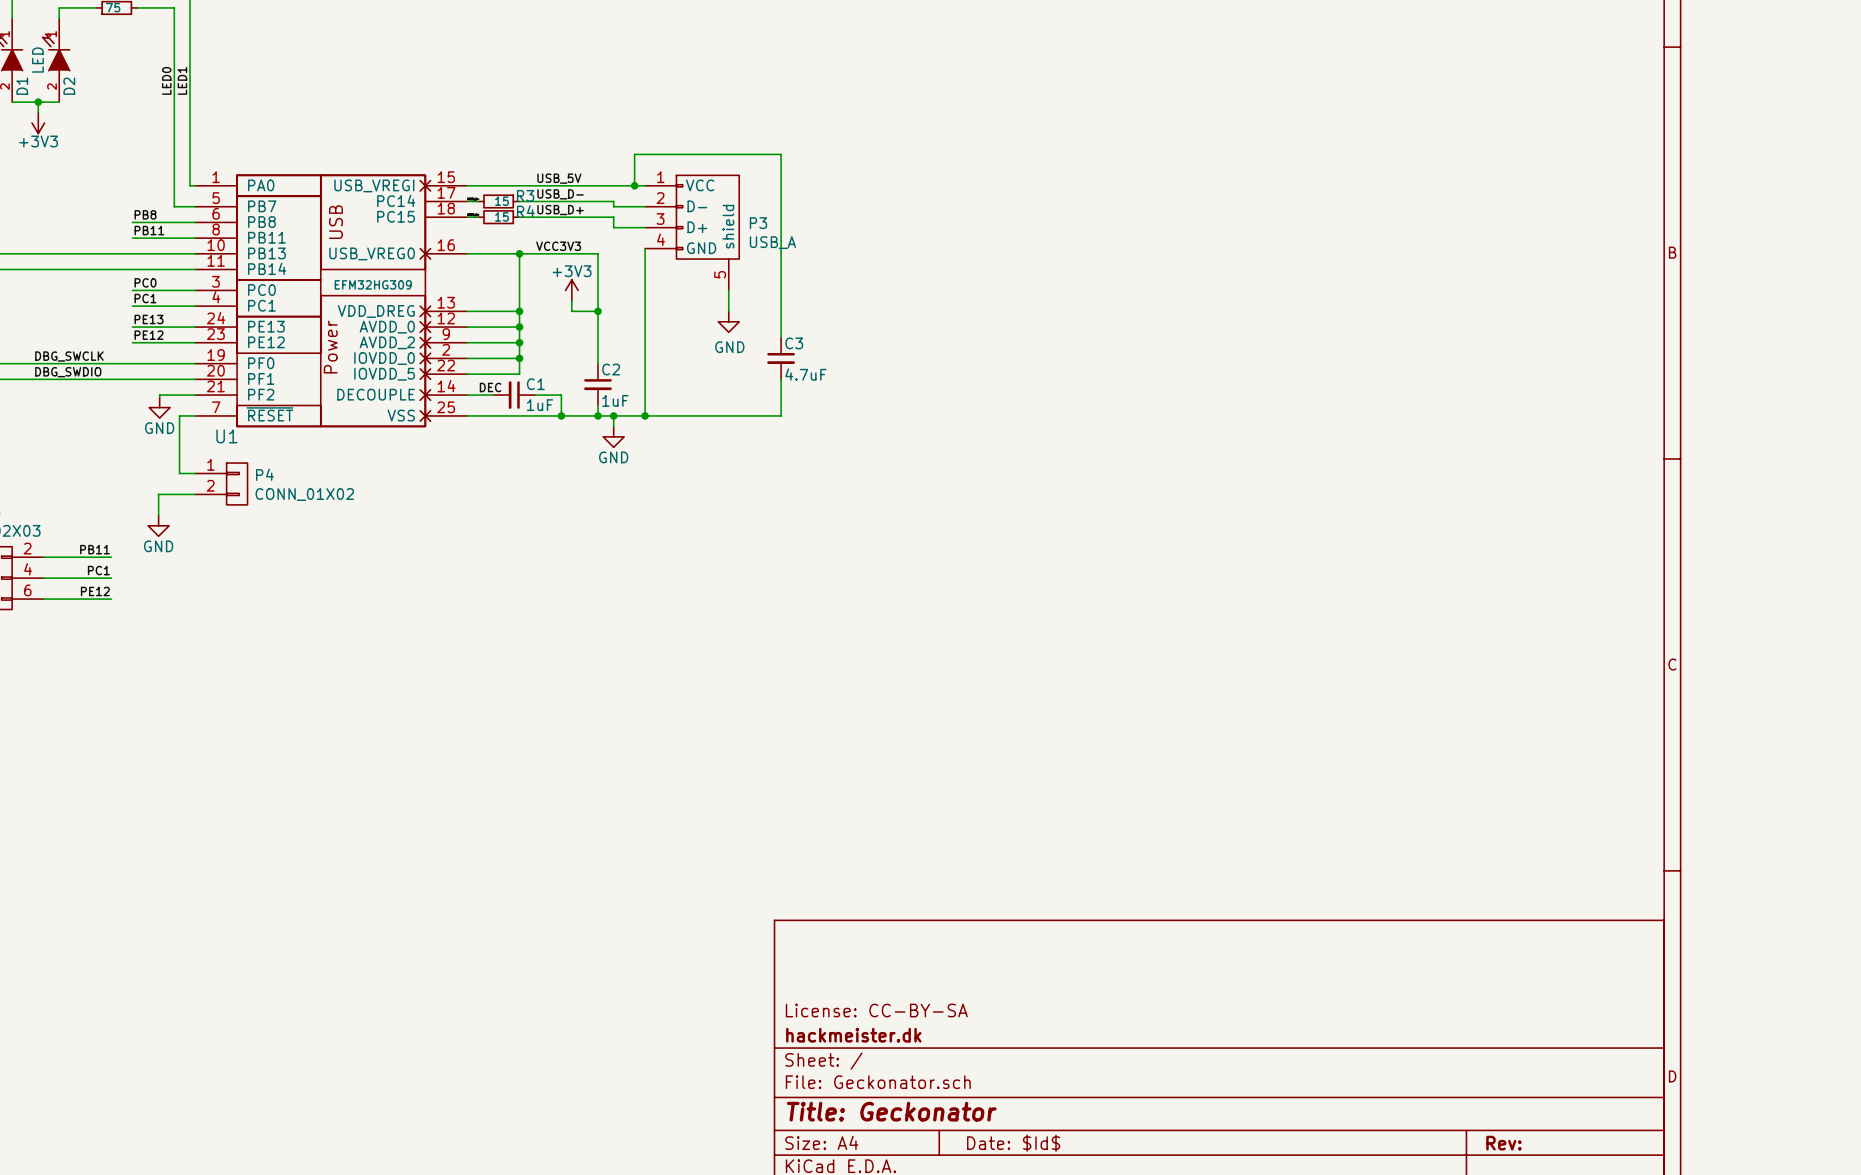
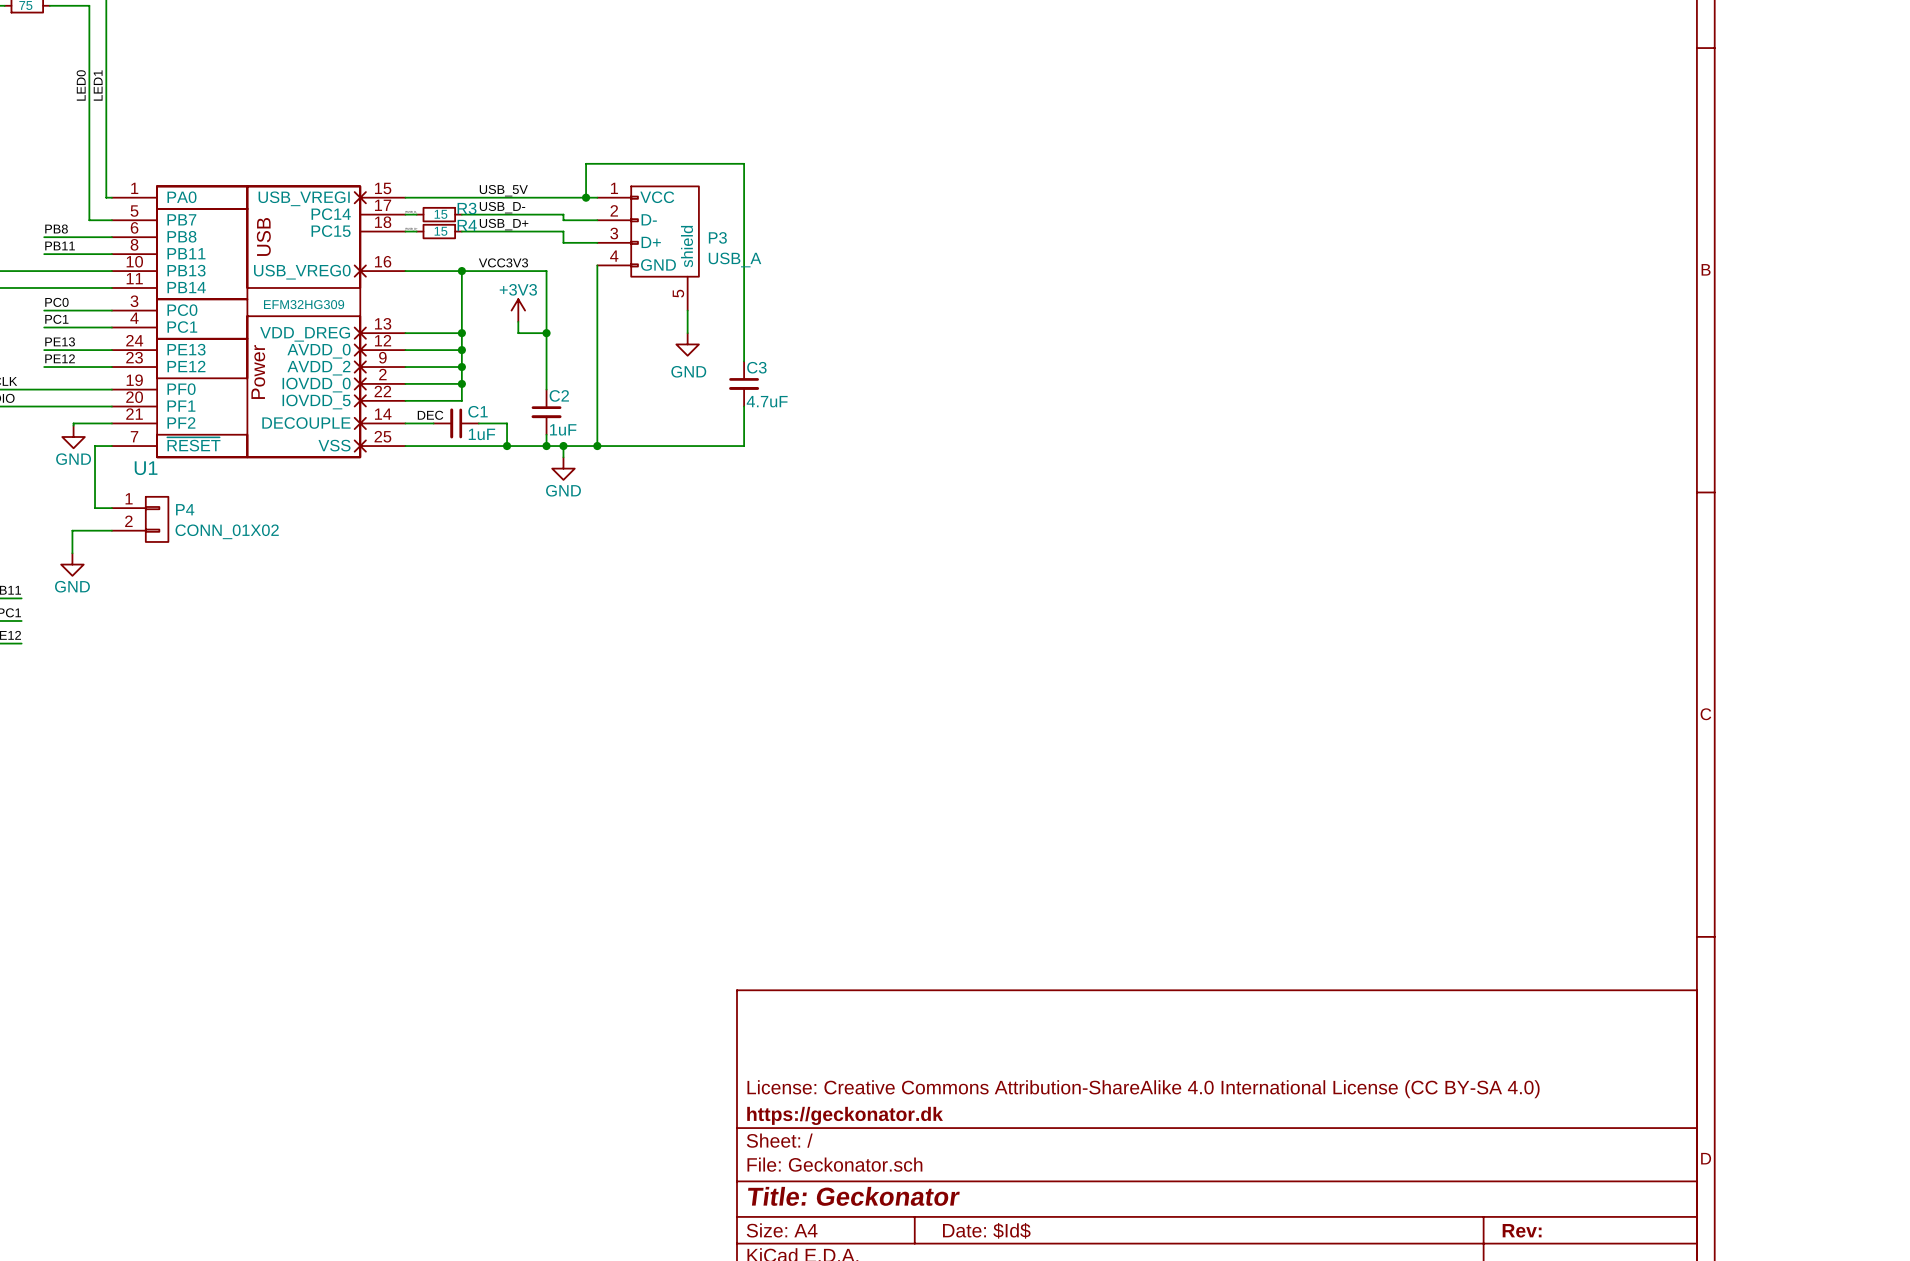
title block: License: CC-BY-SA (876, 1010) -> License: Creative Commons Attribution-ShareAlike 4.0 International License (CC BY-SA 4.0) (1143, 1089)
title block: hackmeister.dk (853, 1035) -> https://geckonator.dk (845, 1115)

